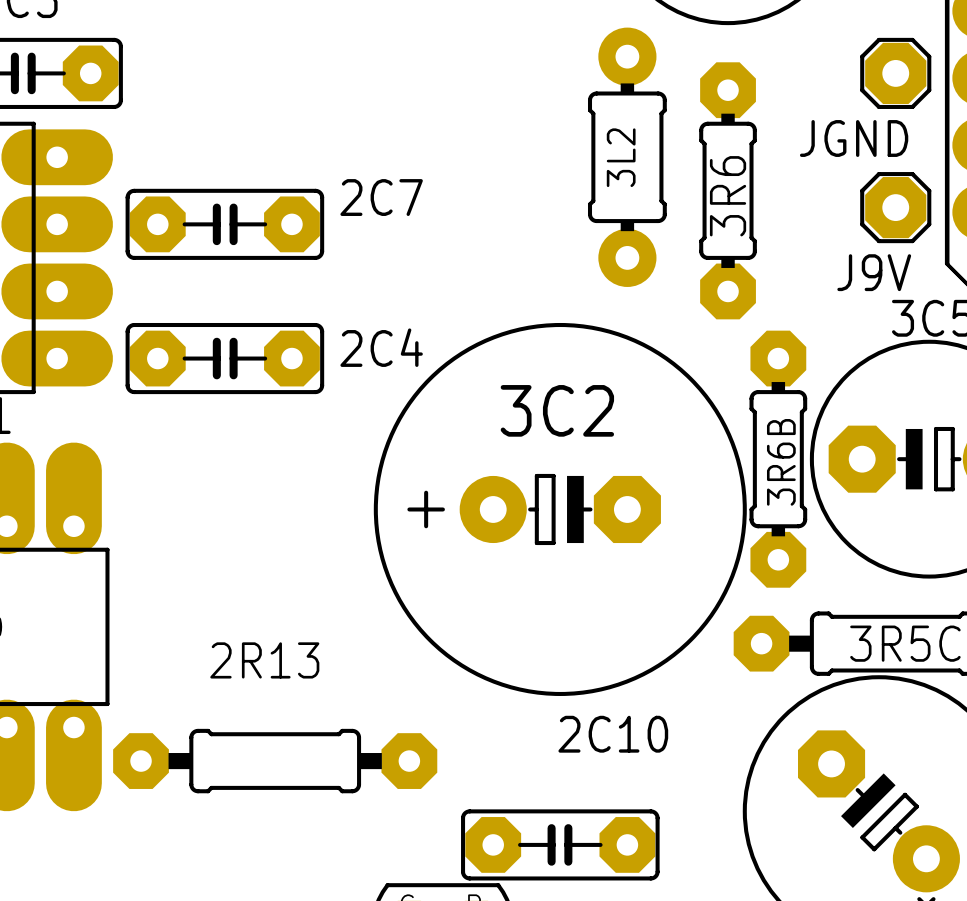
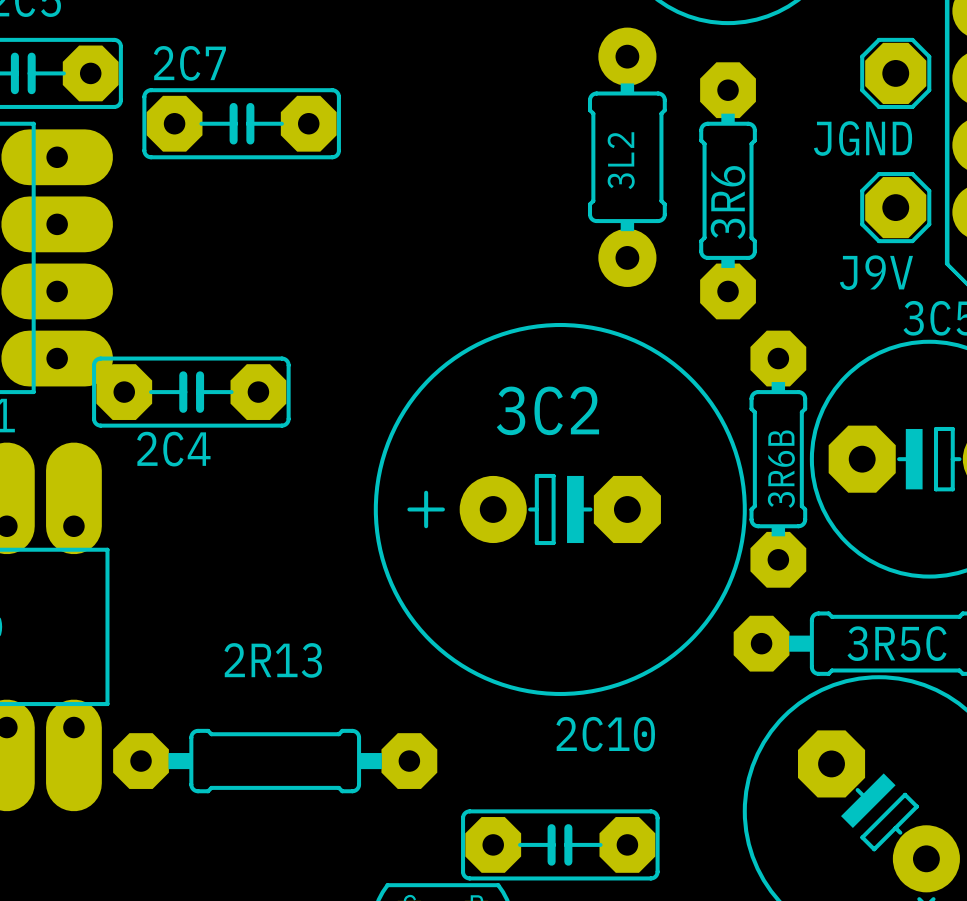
2C7 name position: 2C7 (381, 197) -> 2C7 (189, 63)
2C7 position: (224, 224) -> (241, 123)
2C4 name position: 2C4 (381, 347) -> 2C4 (173, 449)
2C4 position: (224, 358) -> (191, 392)

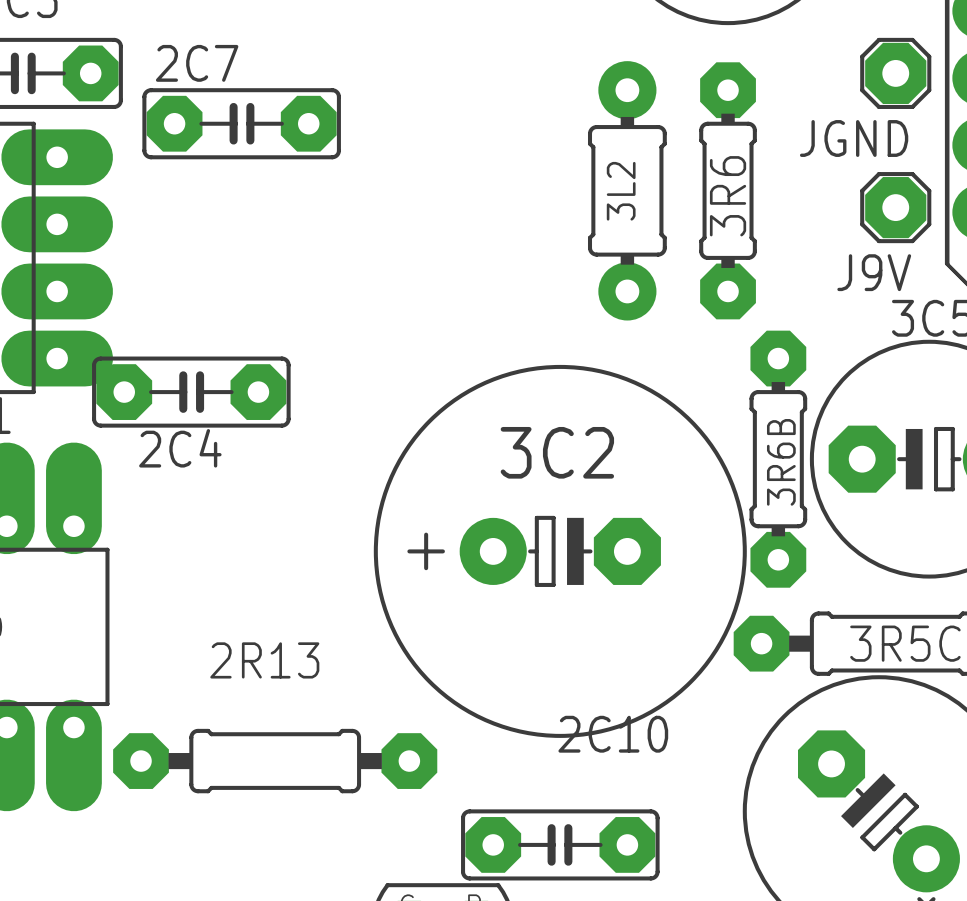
3L2 position: (627, 157) -> (627, 190)
3C2 position: (560, 509) -> (560, 551)

